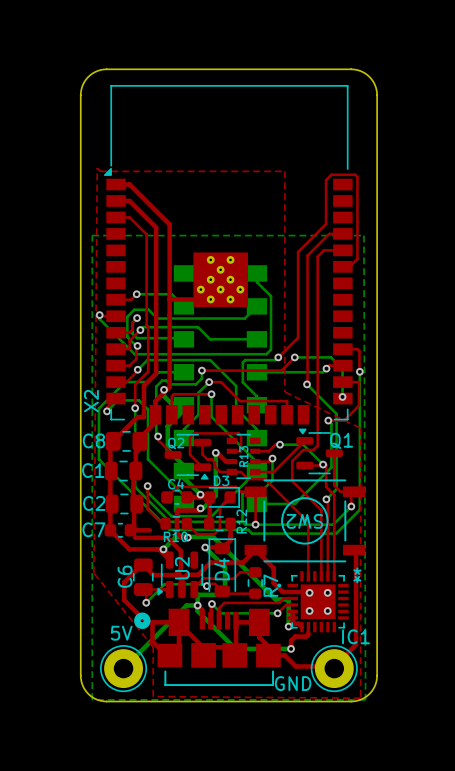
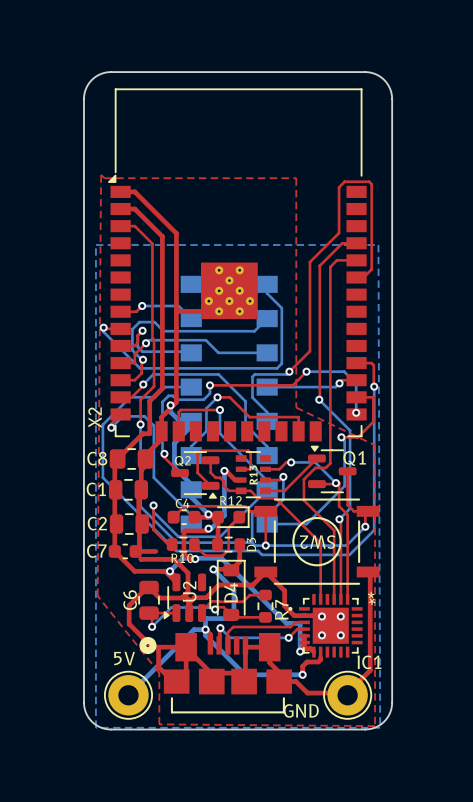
D3 name rotation: 0° (221, 480) -> 90° counterclockwise (251, 544)
D3 name position: D3 (221, 480) -> D3 (251, 544)
R12 name rotation: 0° (241, 521) -> 90° clockwise (230, 500)
R12 name position: R12 (241, 521) -> R12 (230, 500)

